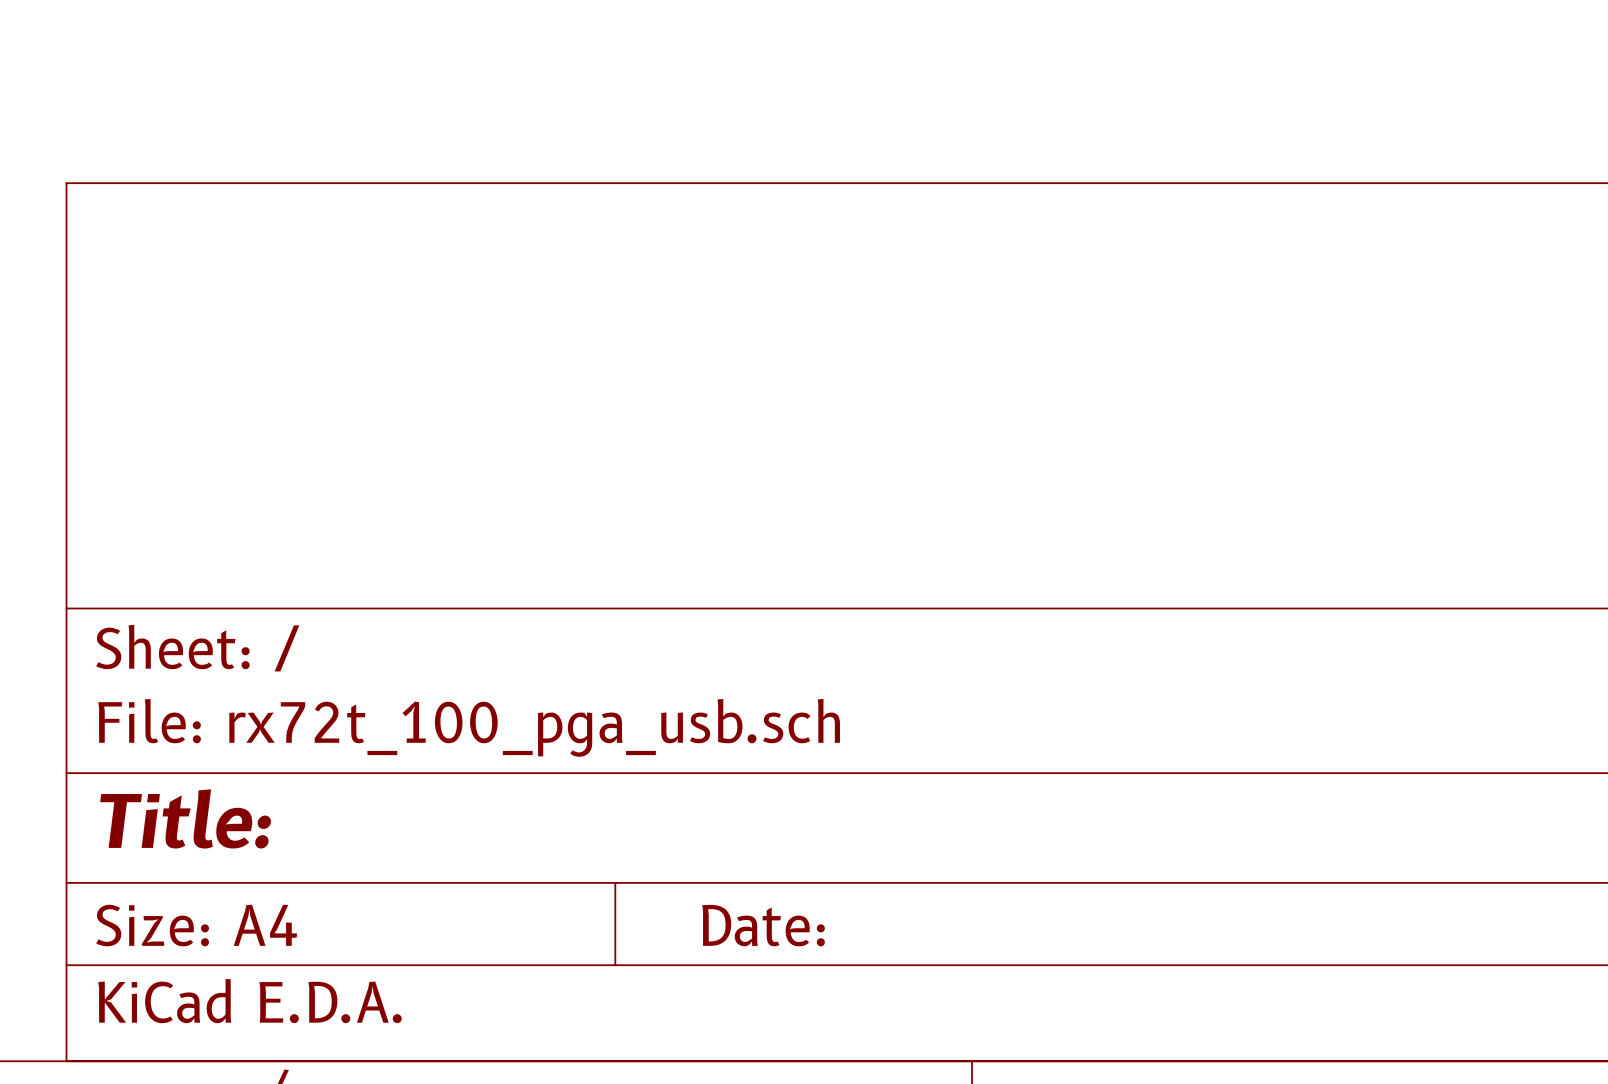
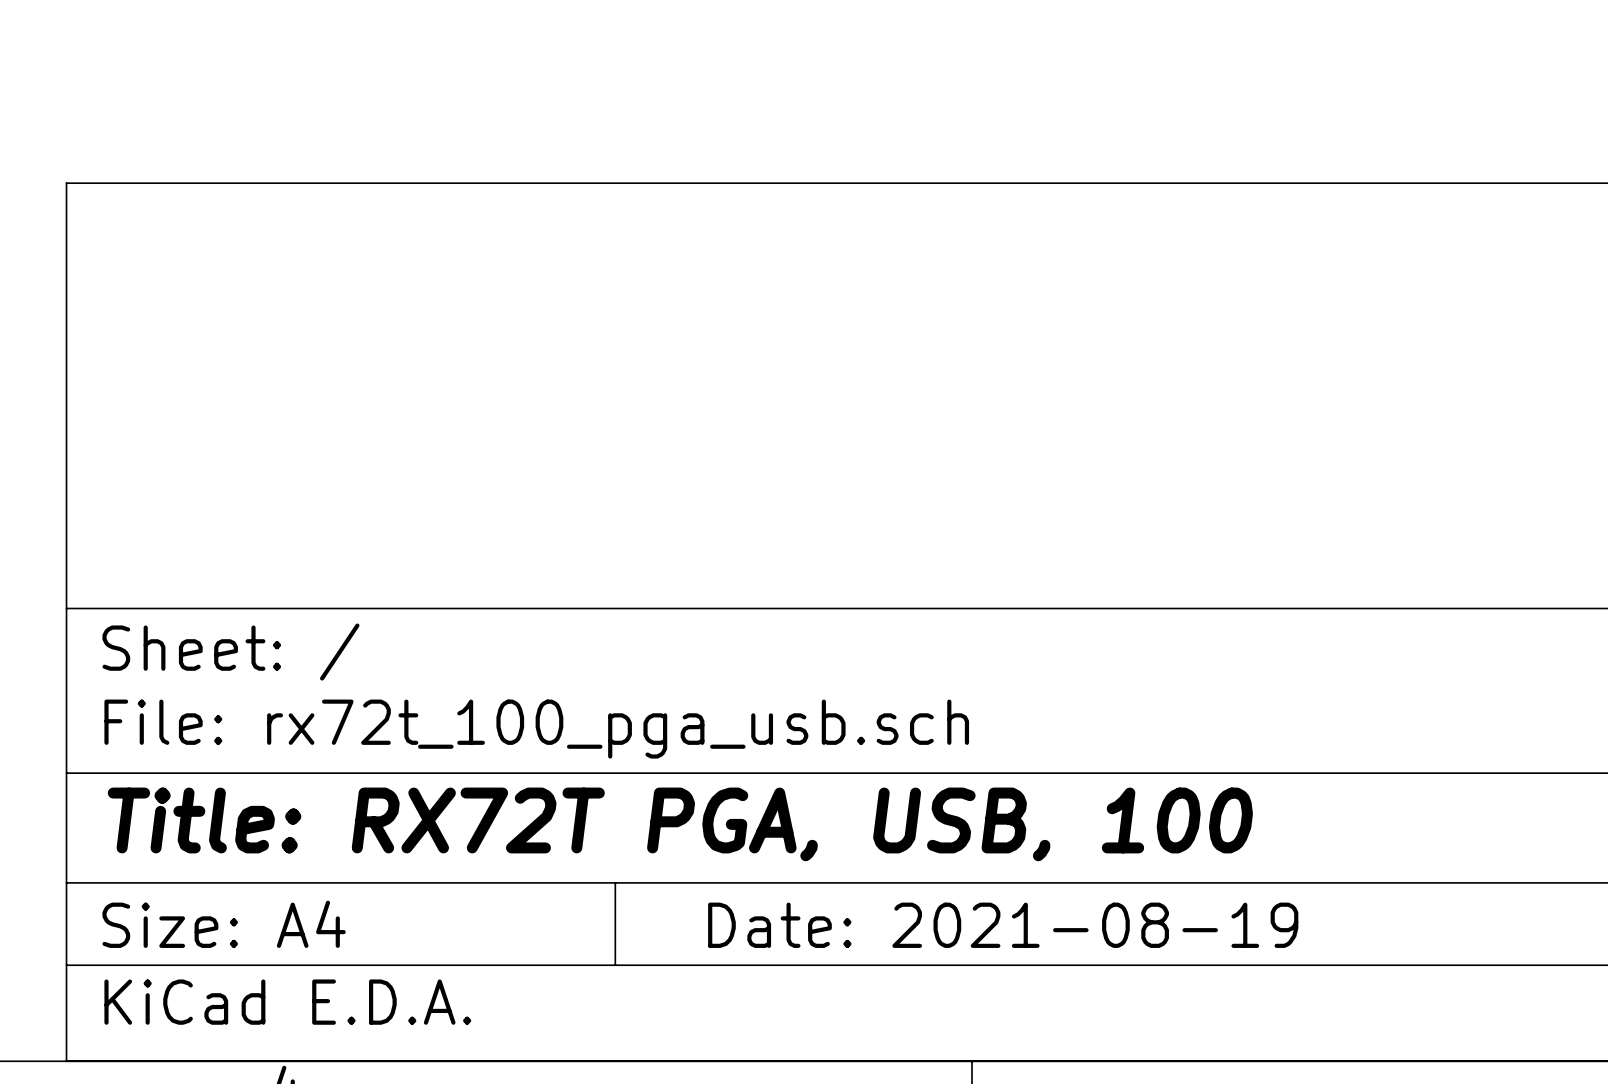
title block: Title: (185, 818) -> Title: RX72T PGA, USB, 100 (680, 824)
title block: Date: (763, 925) -> Date: 2021-08-19 (1003, 925)

